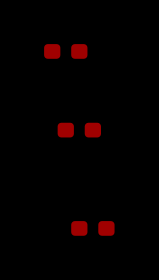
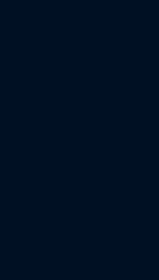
part: (65, 51) -> none
part: (79, 130) -> none
part: (92, 228) -> none

